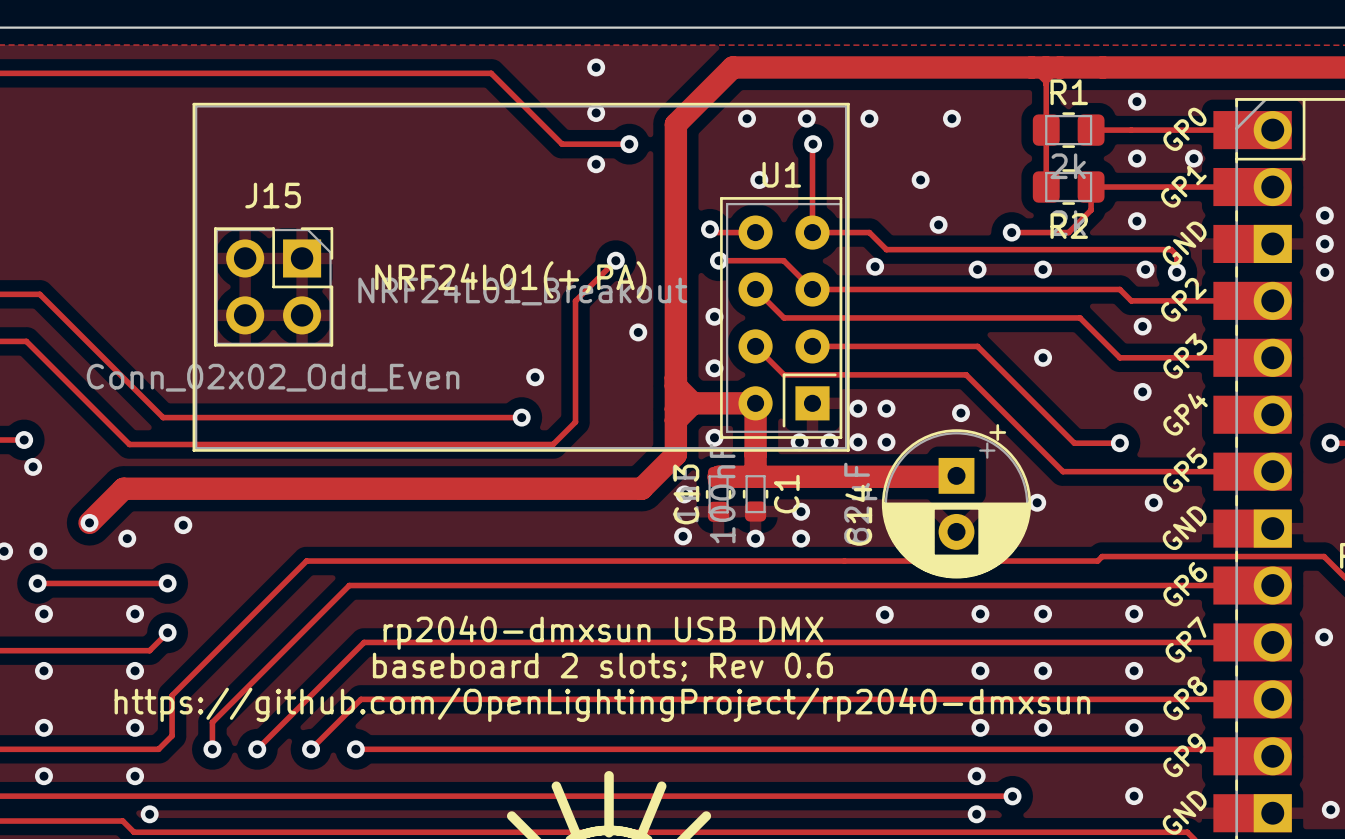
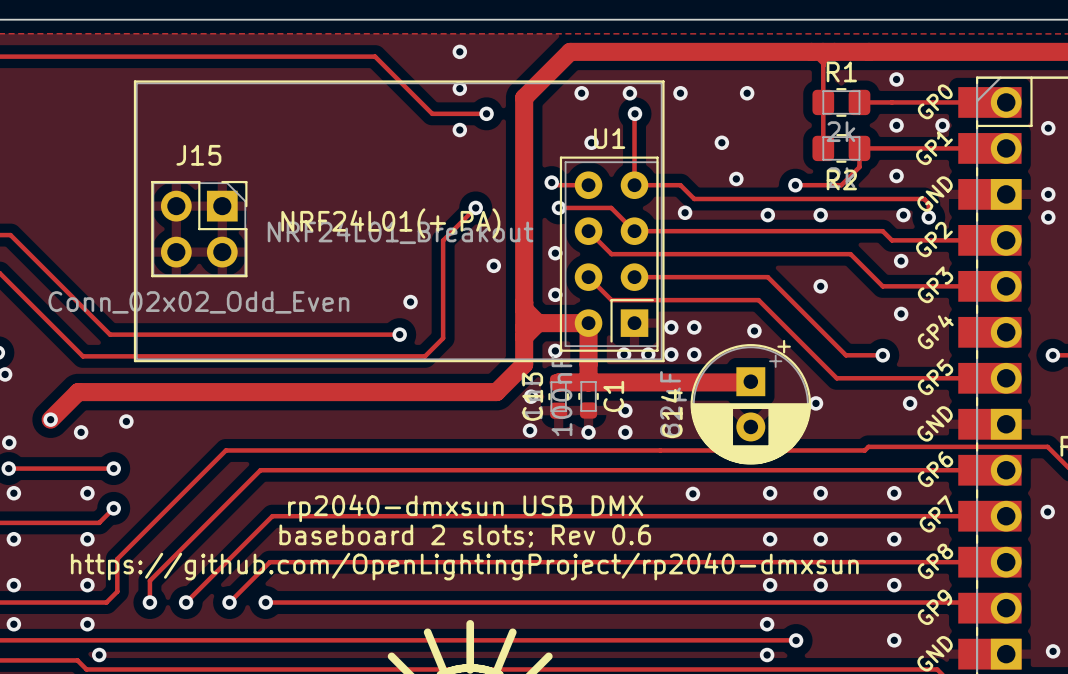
via position: (1324, 215) -> (1048, 128)

